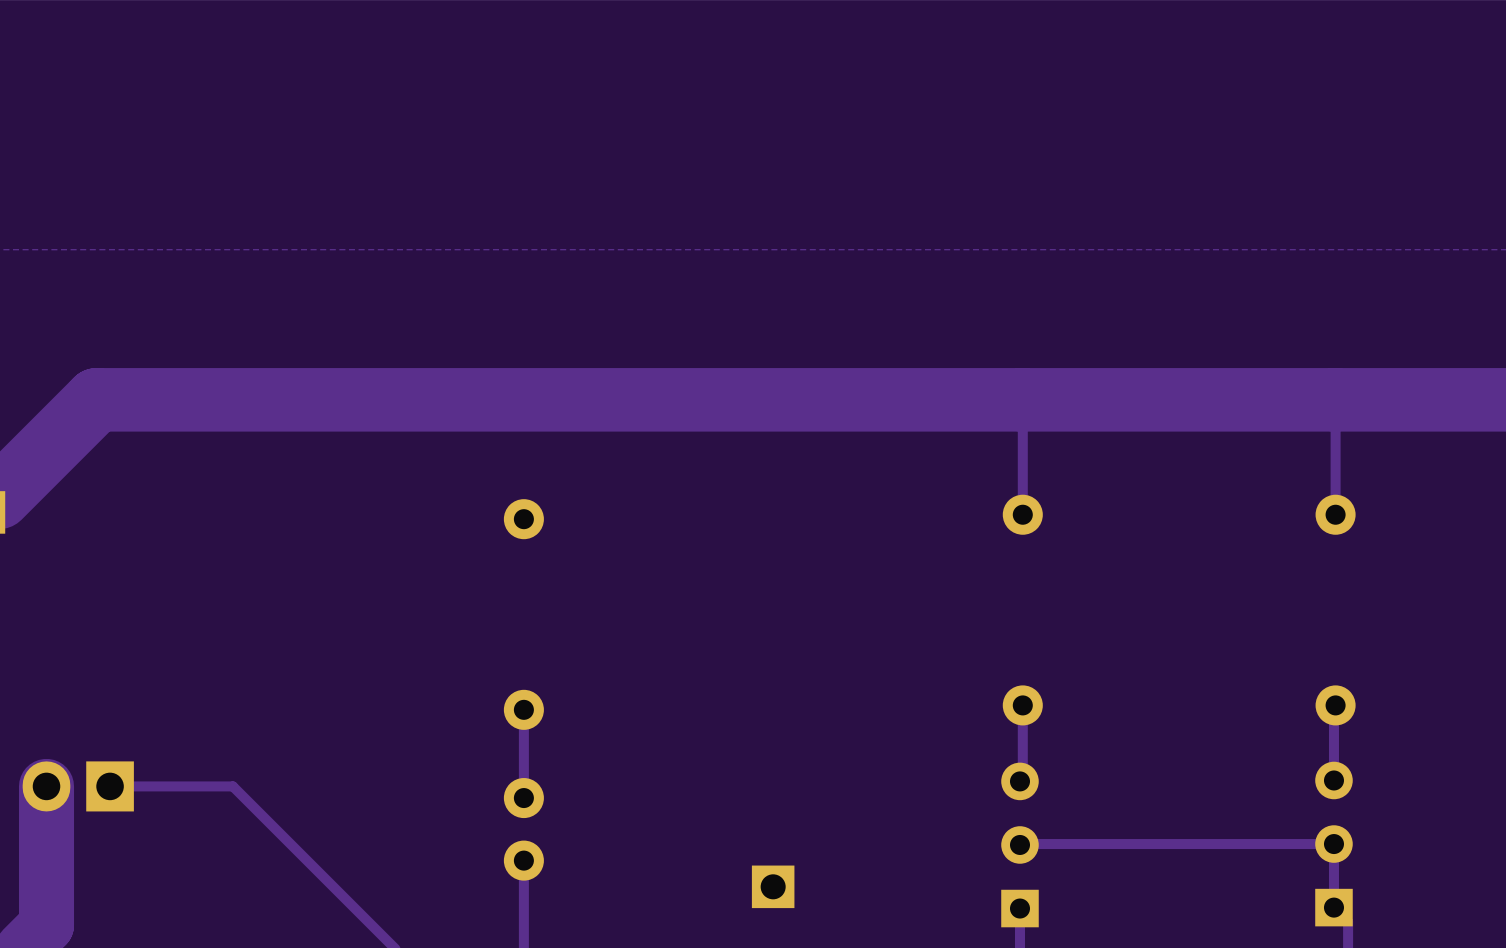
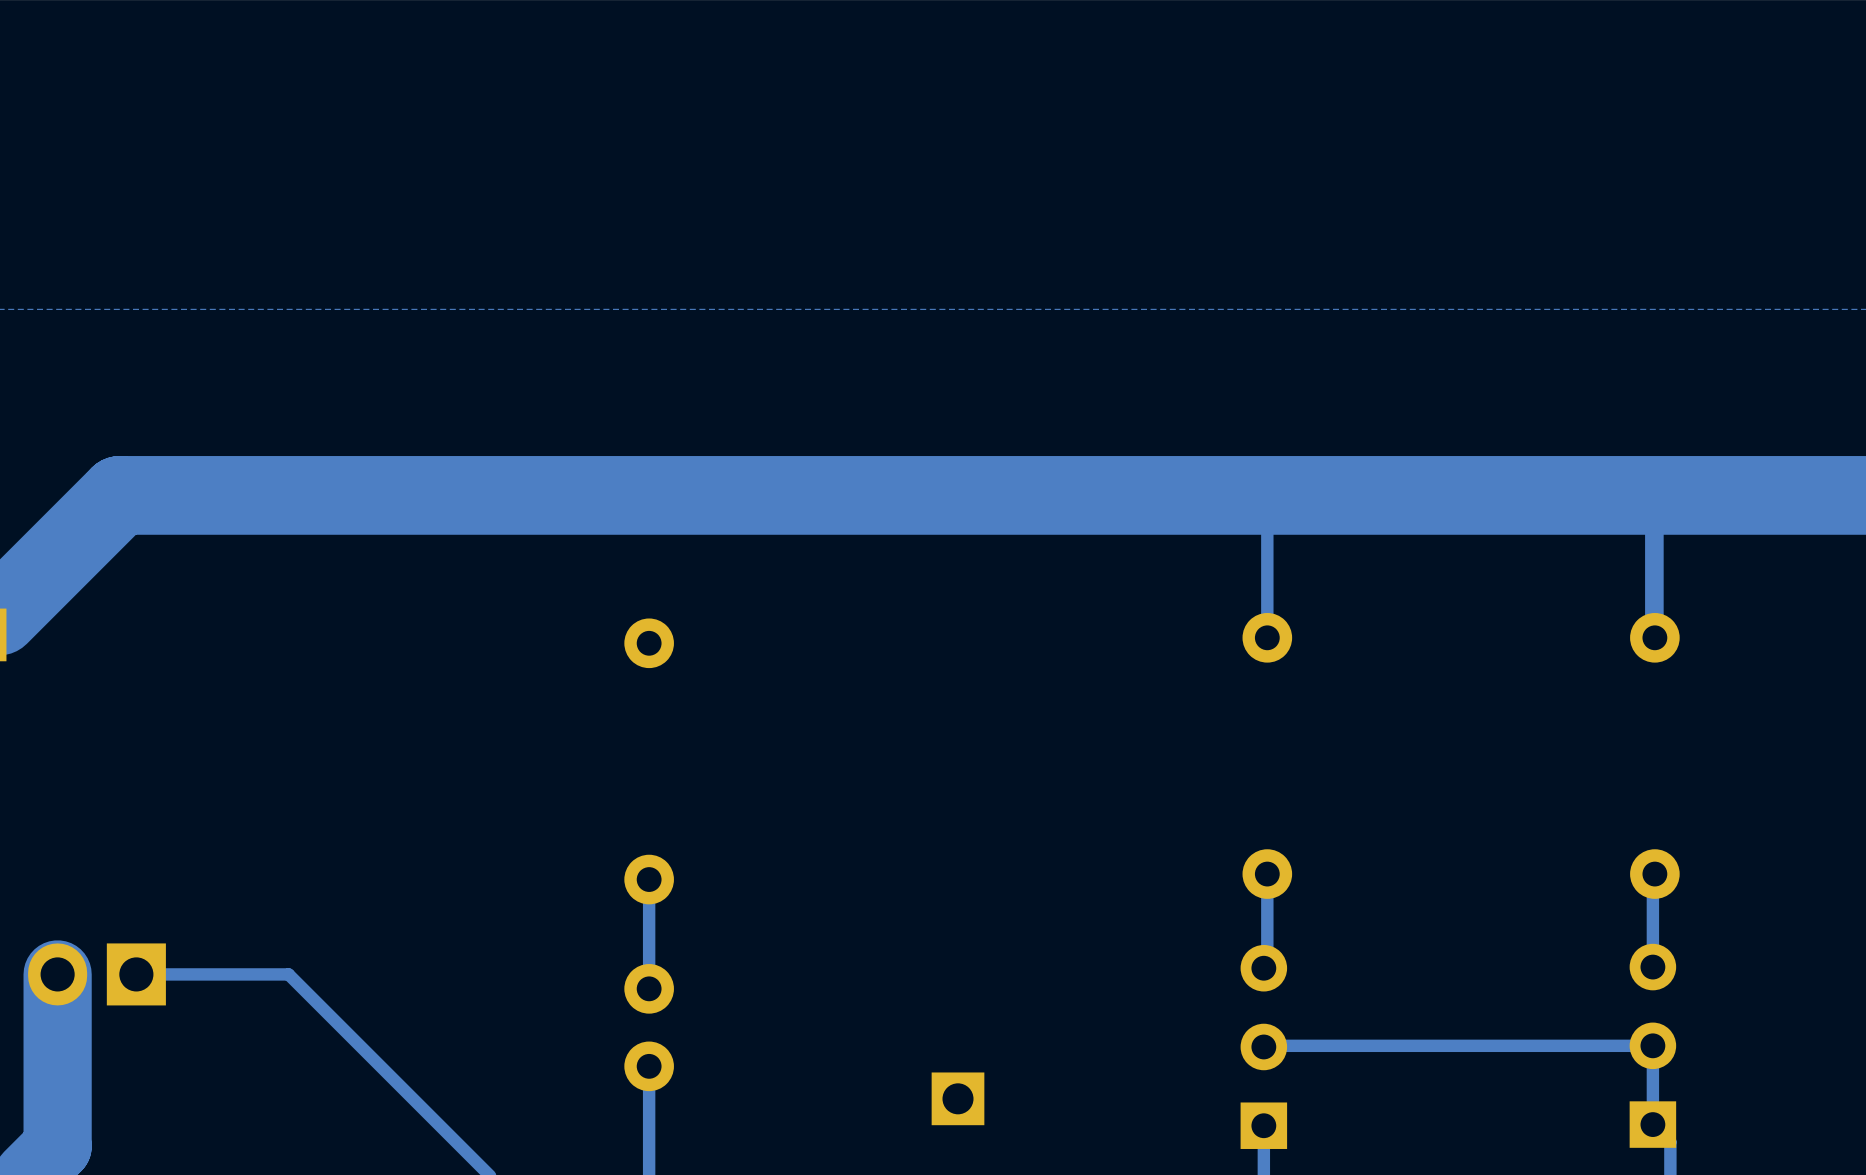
track: none -> (1654, 486) (1654, 628)
track: (1335, 399) (1335, 514) -> none

